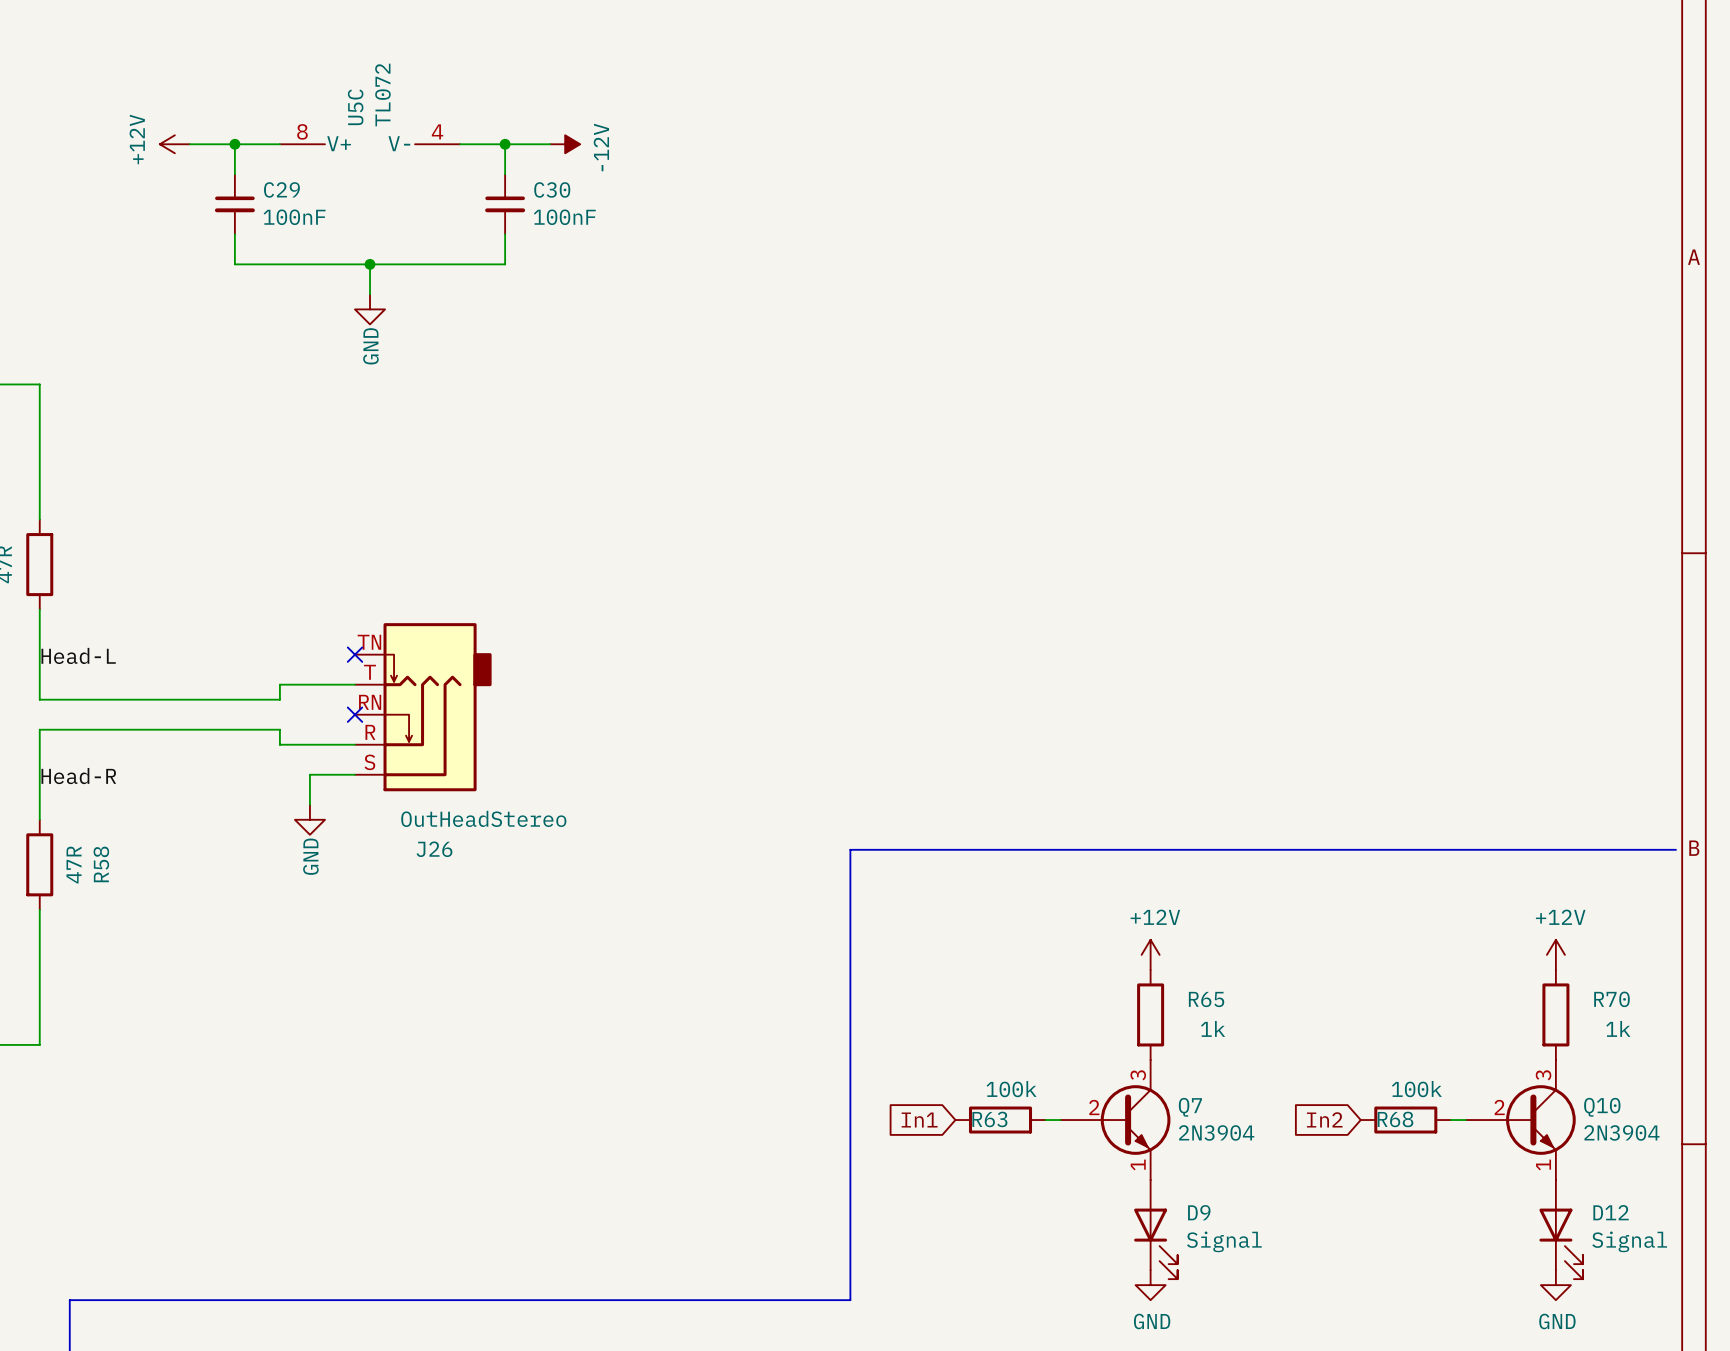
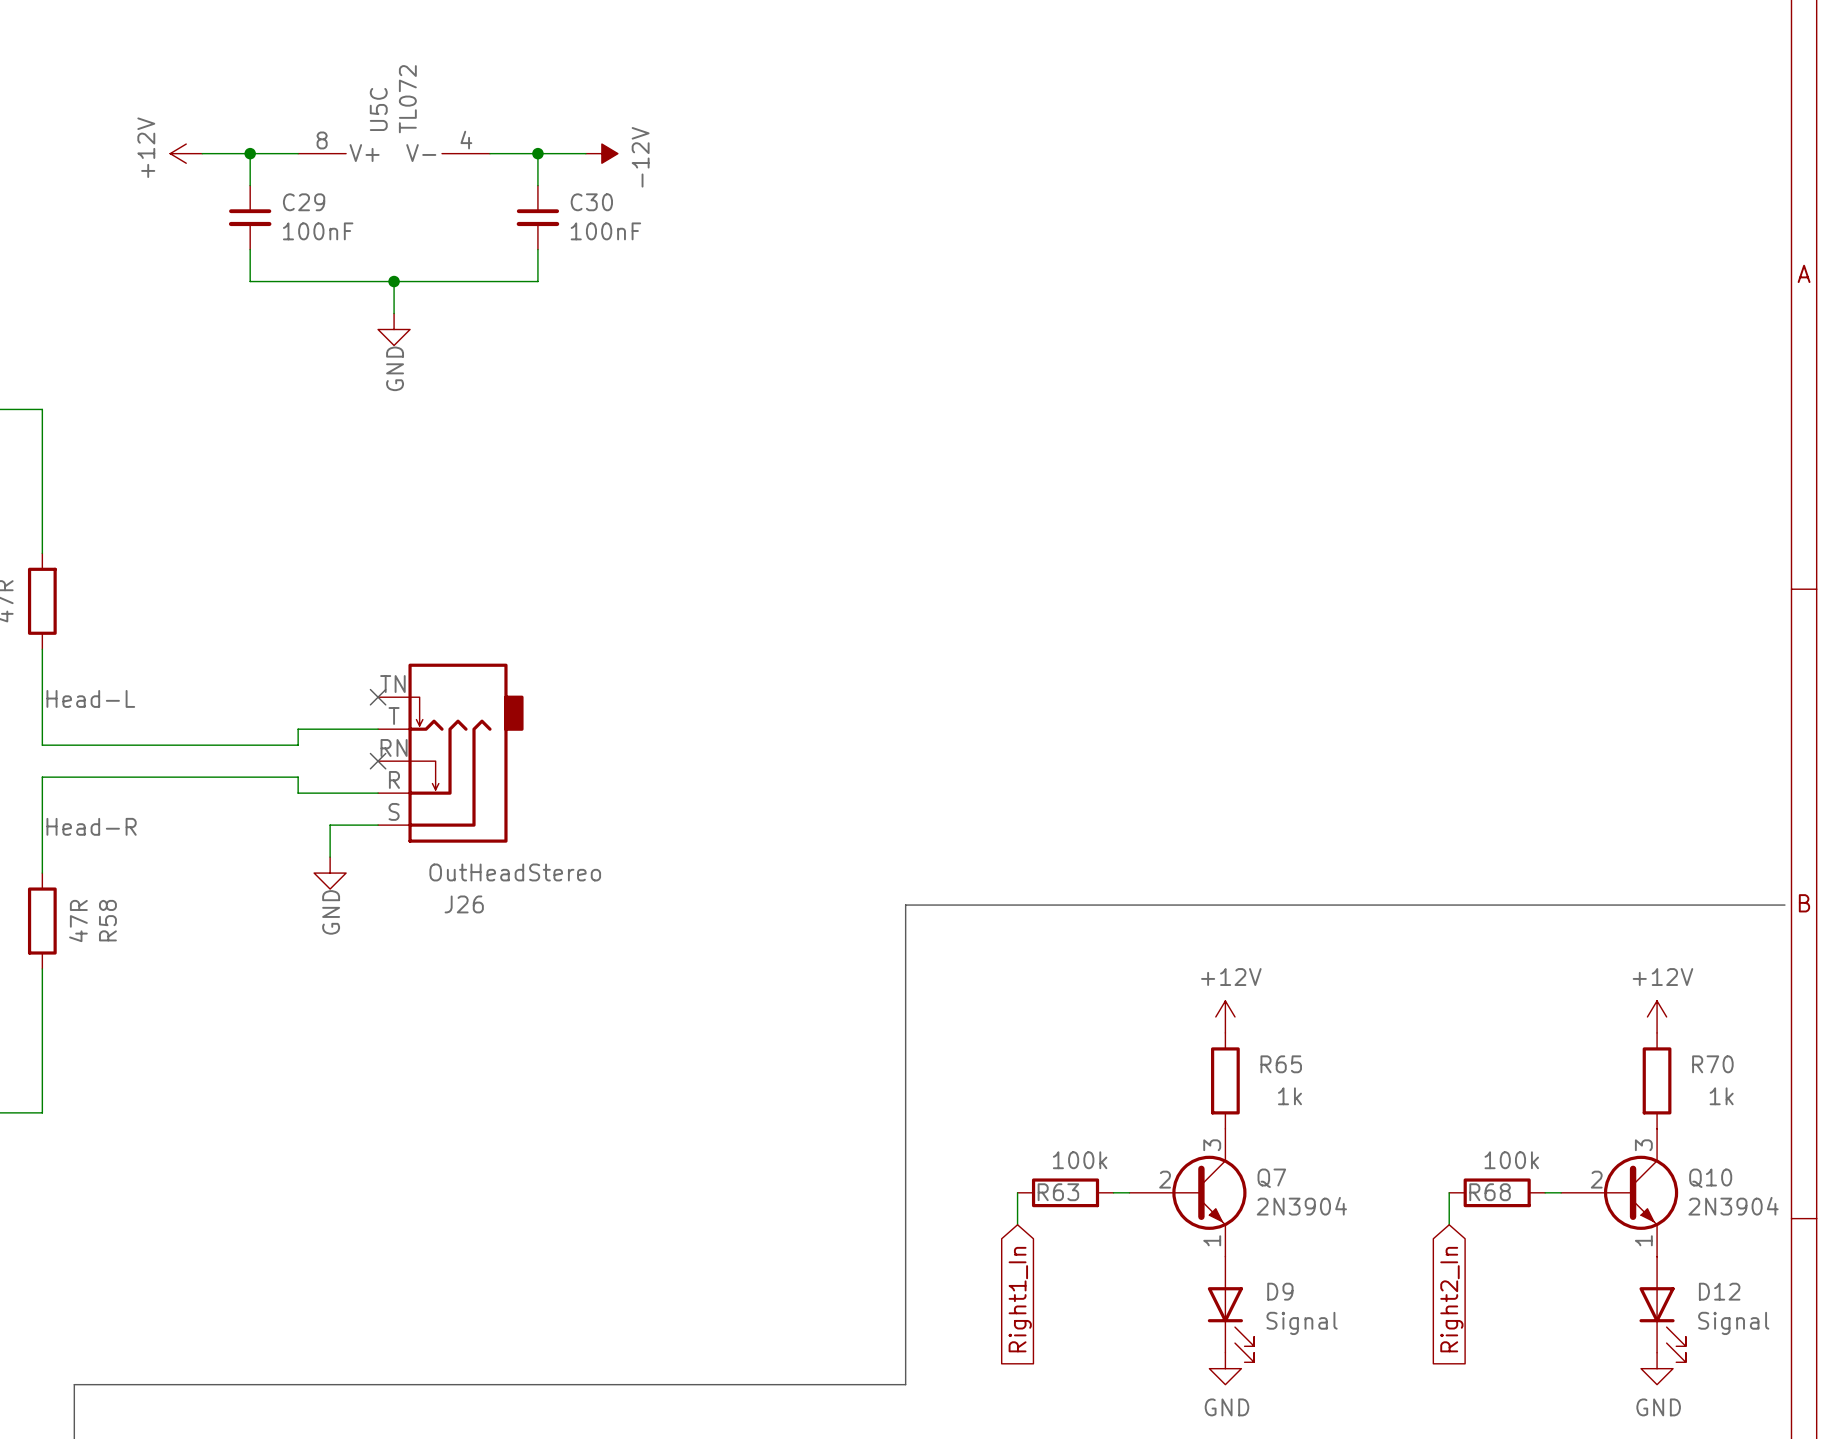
global label: In2 (1324, 1119) -> none
global label: In1 (919, 1120) -> none
wire: none -> (1017, 1192) (1017, 1224)
wire: none -> (1449, 1192) (1449, 1224)
global label: none -> Right1_In (1020, 1299)
global label: none -> Right2_In (1451, 1299)

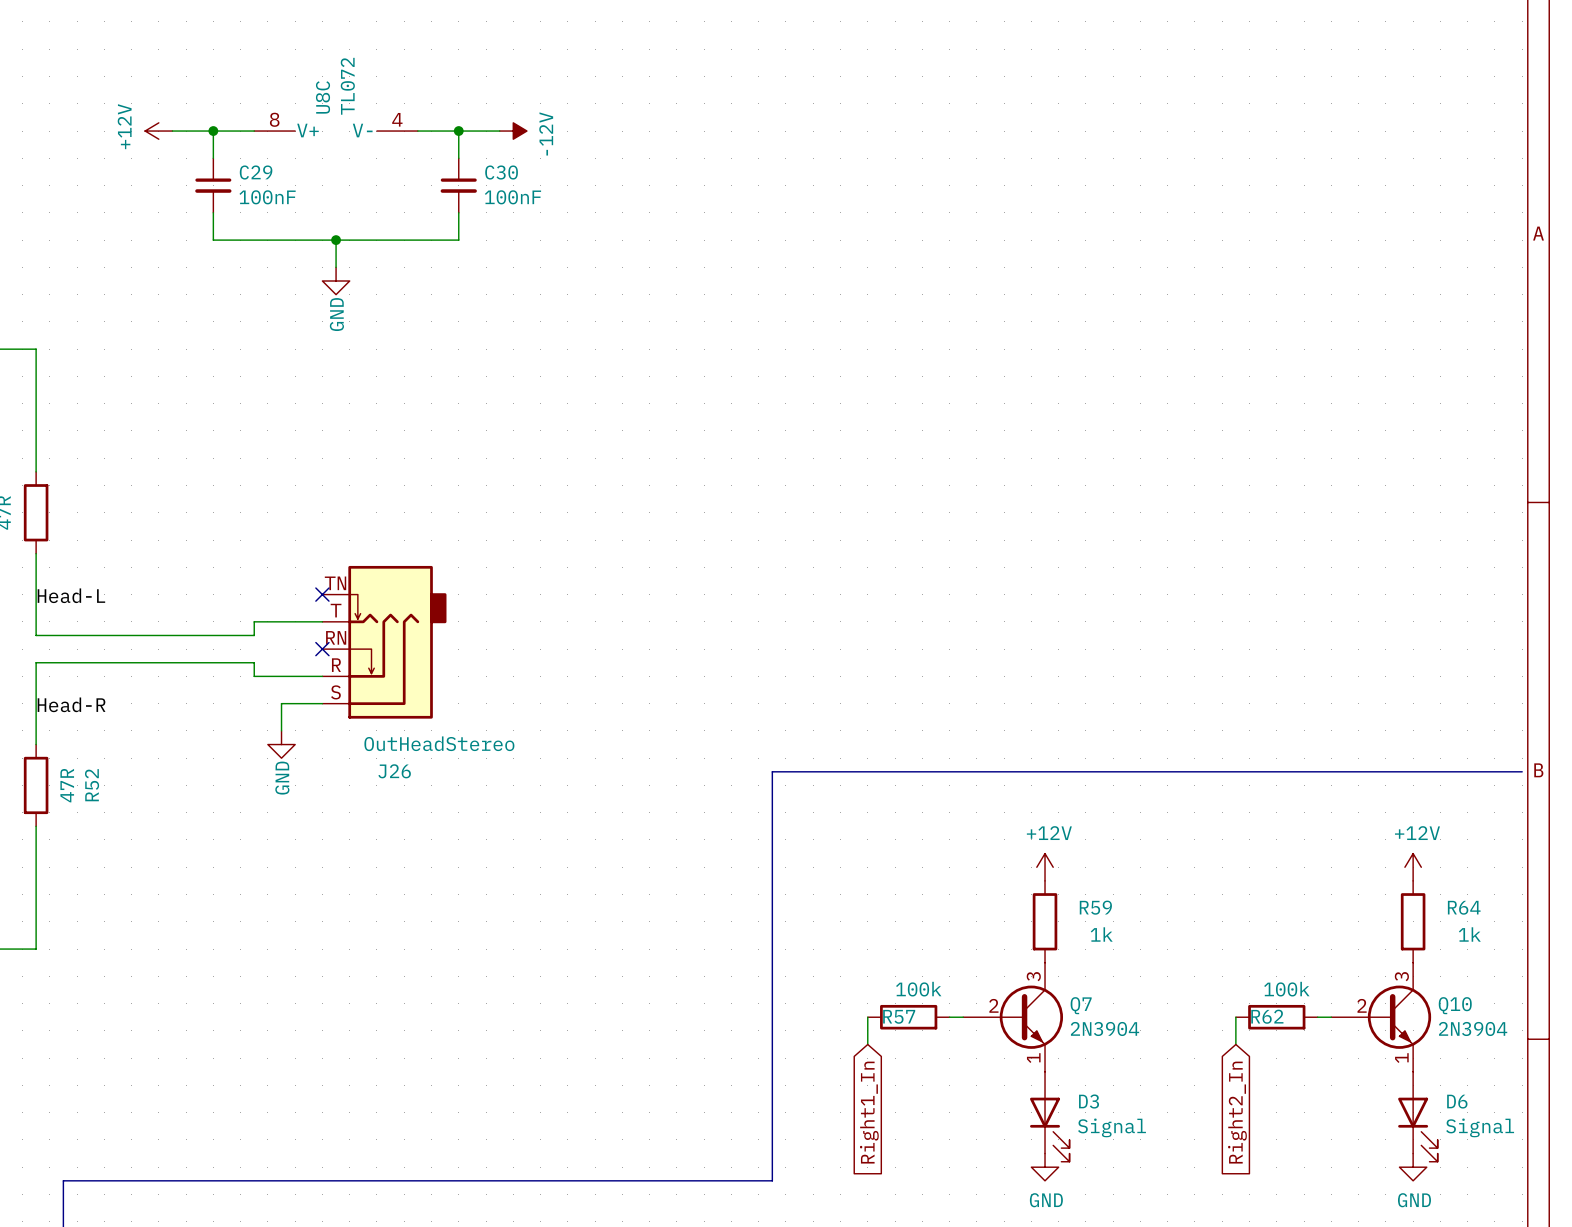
U5C name: U5C (378, 109) -> U8C (323, 97)
R58 name: R58 (107, 920) -> R52 (92, 785)
R65 name: R65 (1281, 1064) -> R59 (1095, 907)
R70 name: R70 (1712, 1064) -> R64 (1464, 907)
R63 name: R63 (1058, 1192) -> R57 (899, 1016)
R68 name: R68 (1490, 1192) -> R62 (1267, 1016)
D9 name: D9 (1280, 1291) -> D3 (1089, 1101)
D12 name: D12 (1719, 1291) -> D6 (1457, 1101)

